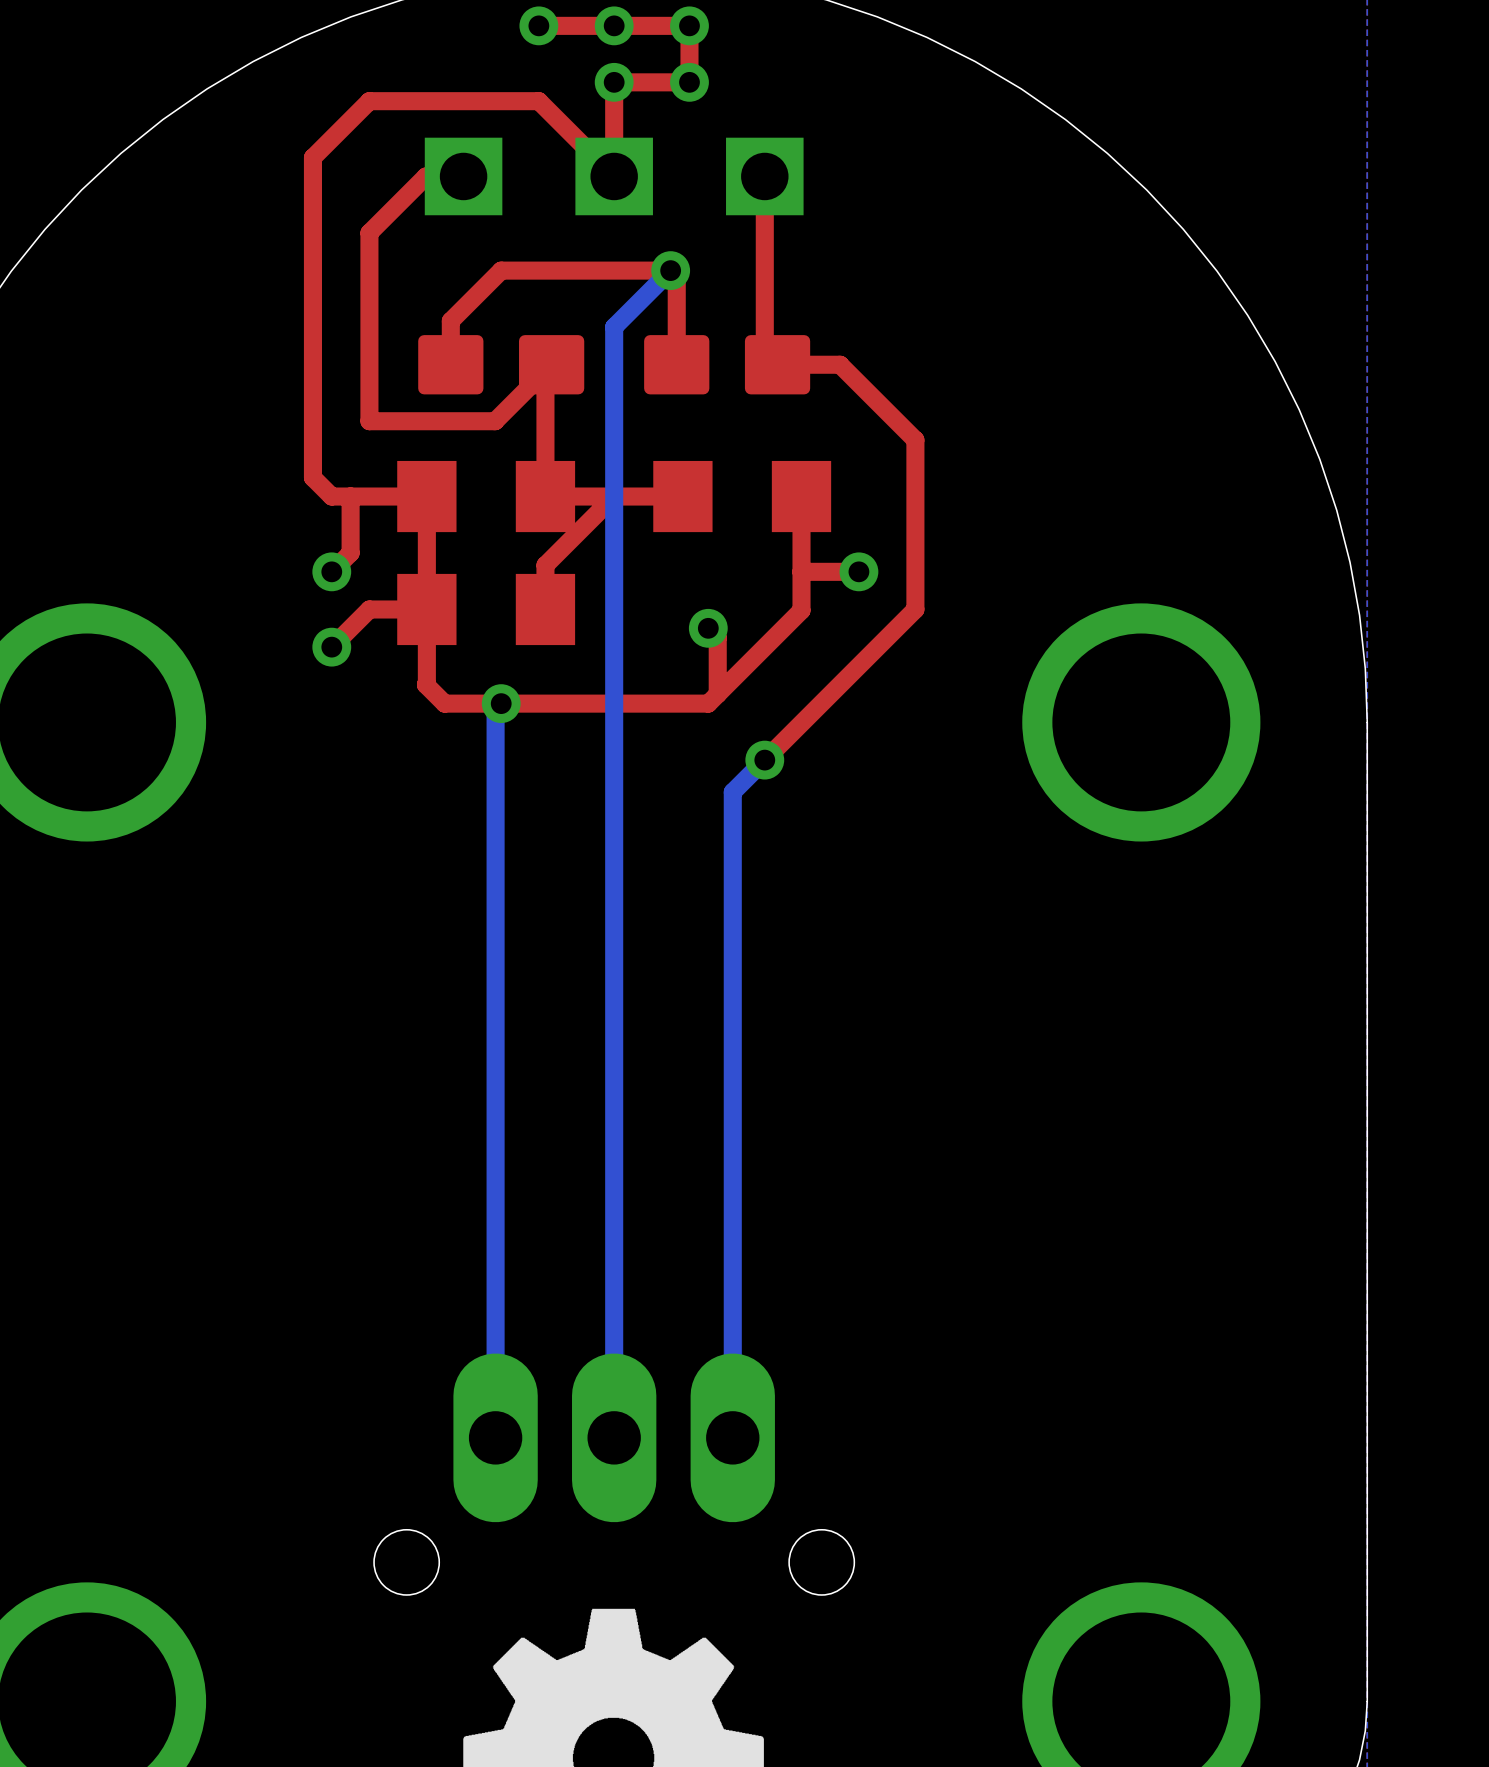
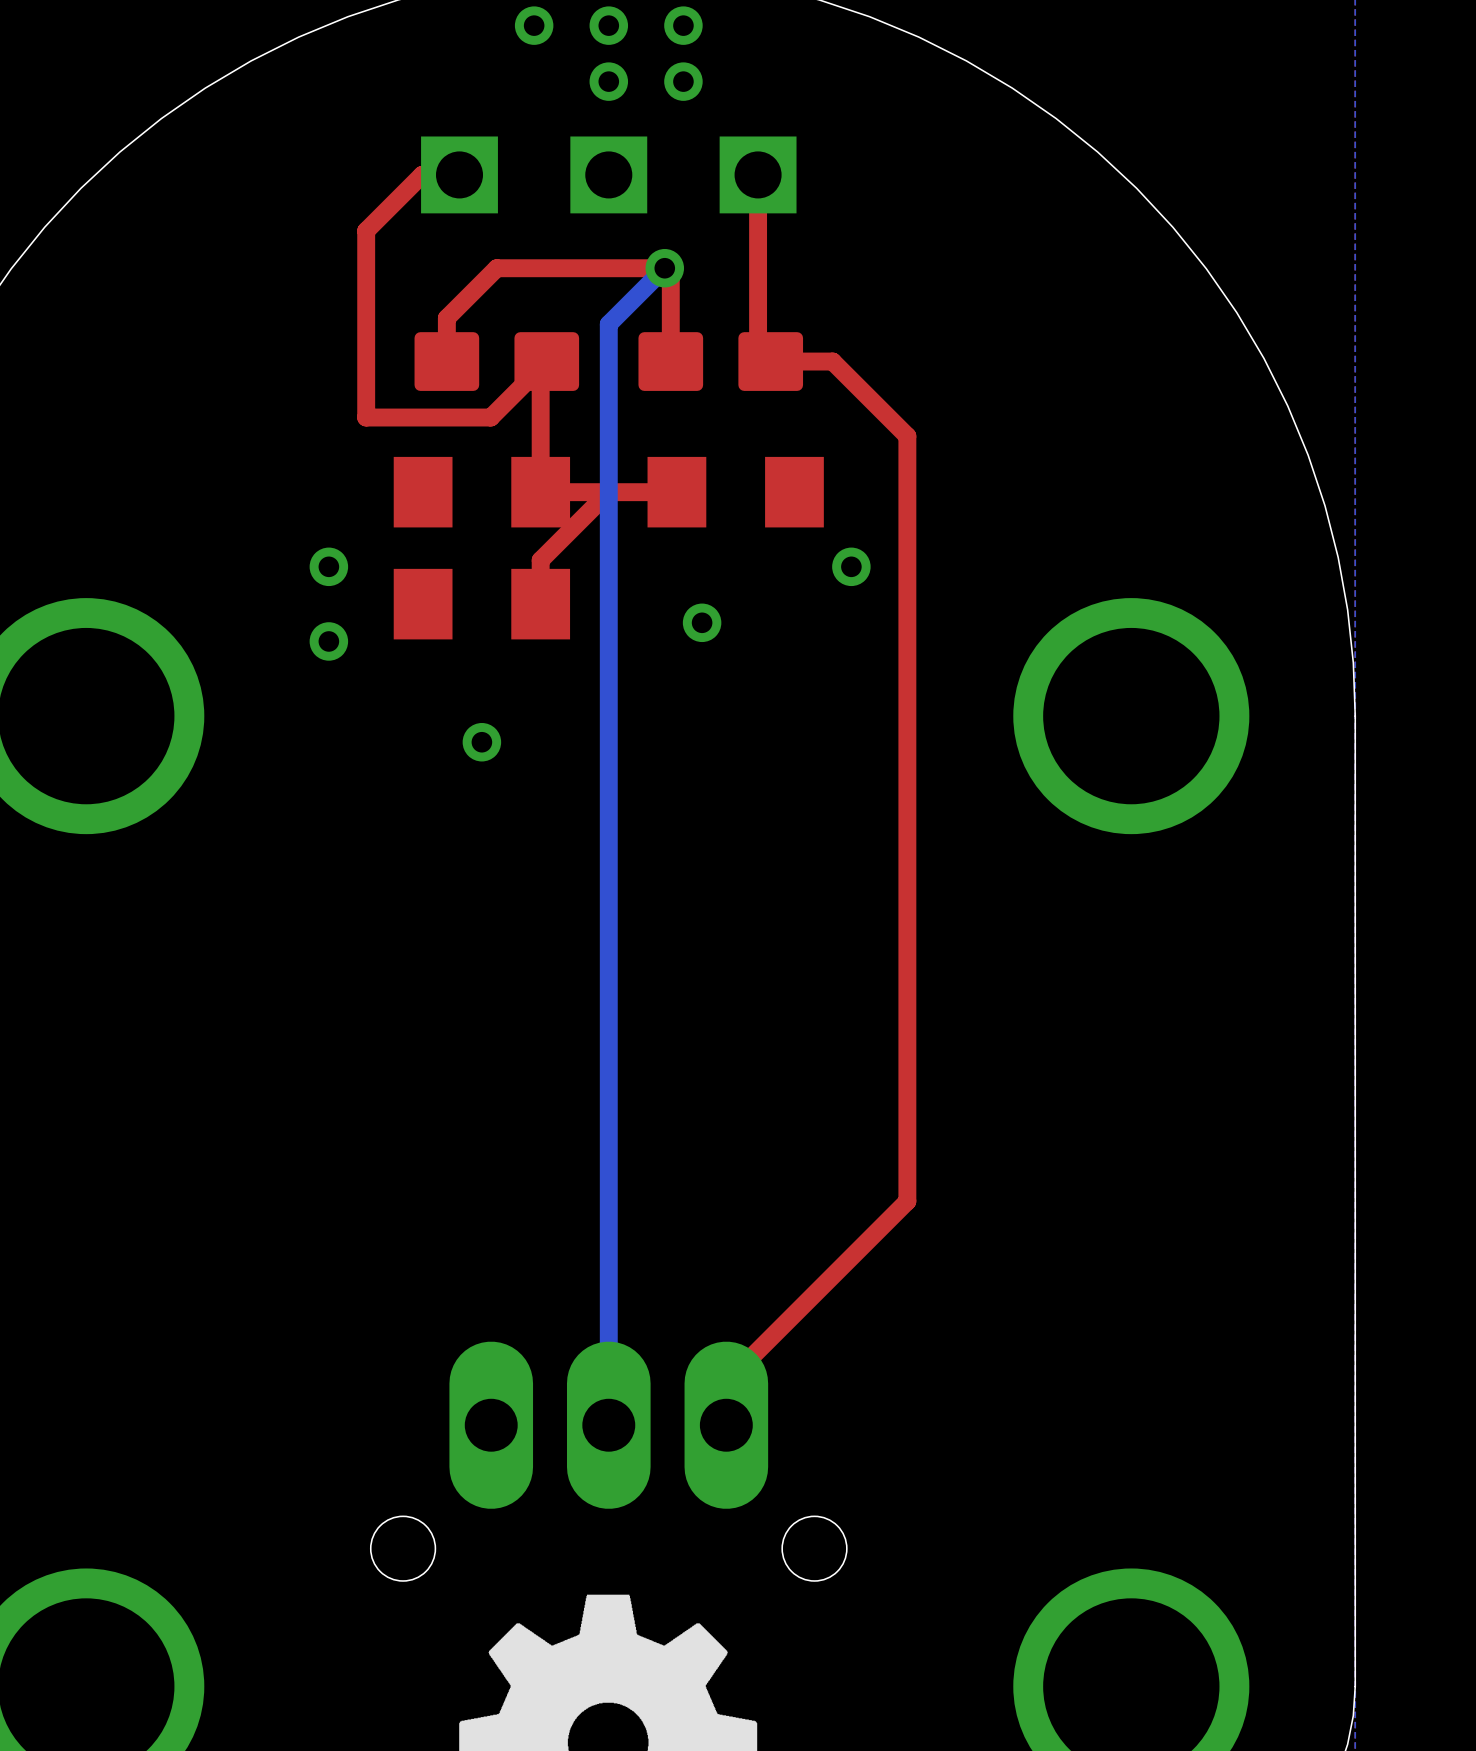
top track: (538, 25) (689, 25) (689, 82) (614, 82) (614, 176) (538, 101) (369, 101) (312, 157) (312, 477) (331, 496) (425, 496) -> none
top track: (350, 496) (350, 553) (331, 571) -> none
top track: (426, 497) (425, 684) (444, 703) (708, 703) (801, 610) (801, 496) (783, 514) -> none
top track: (858, 571) (801, 571) -> none
top track: (426, 609) (369, 609) (331, 647) -> none
top track: (915, 609) (764, 760) -> (907, 604) (907, 1201) (726, 1382) (726, 1425)
top track: (708, 628) (717, 637) (717, 694) -> none
bottom track: (501, 703) (495, 709) (495, 1437) -> none
via position: (501, 703) -> (481, 742)
bottom track: (764, 760) (732, 792) (732, 1437) -> none
via: (764, 760) -> none

